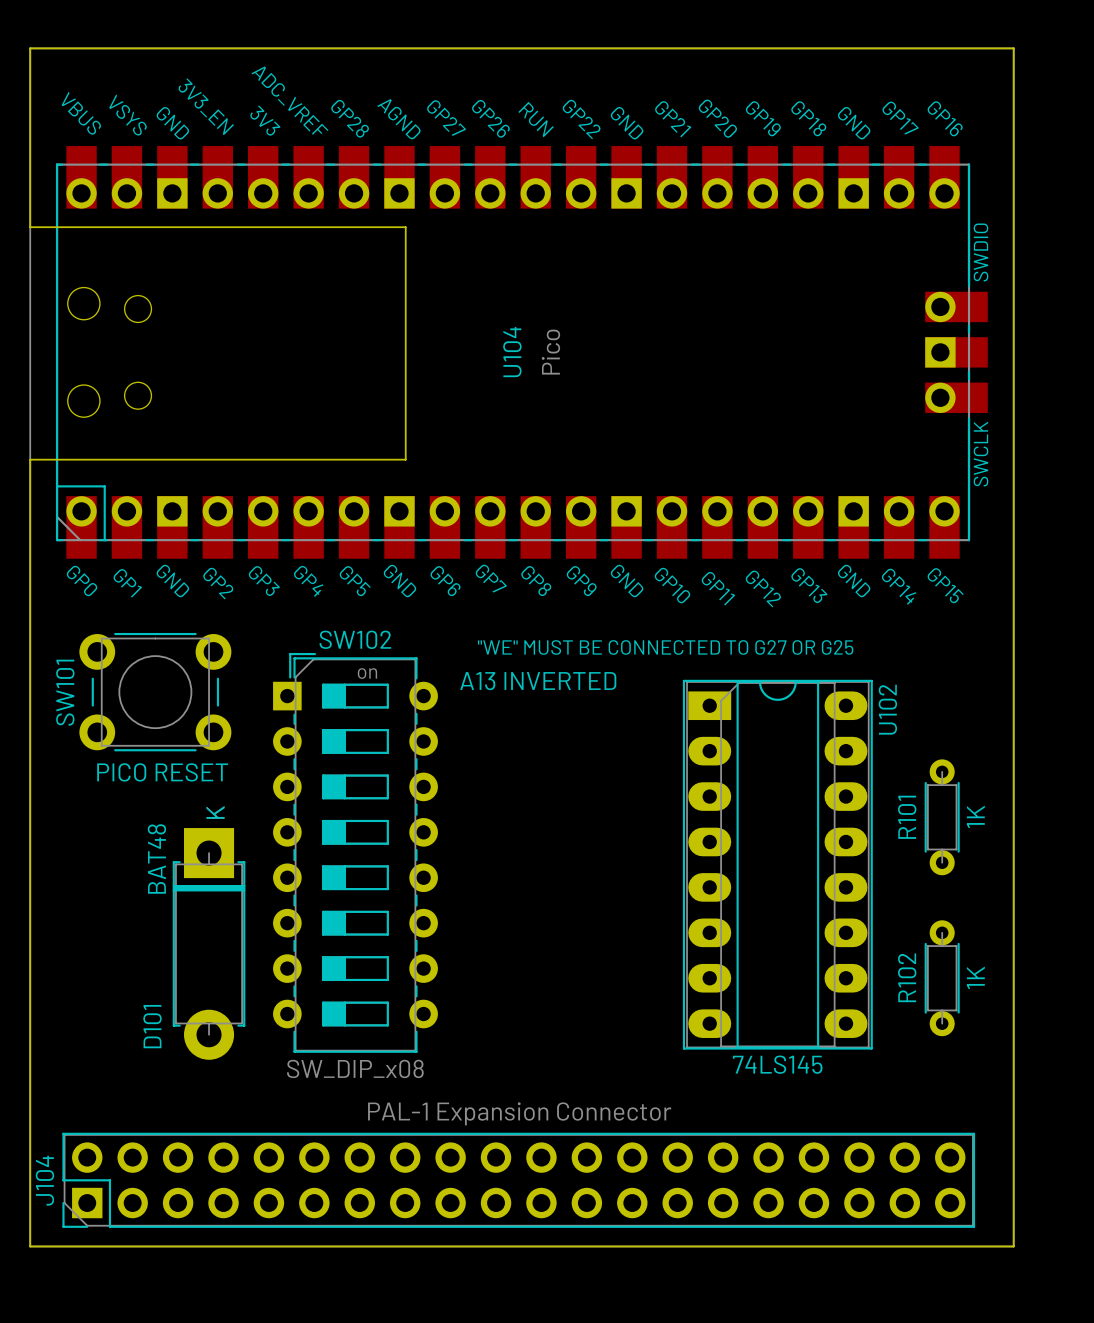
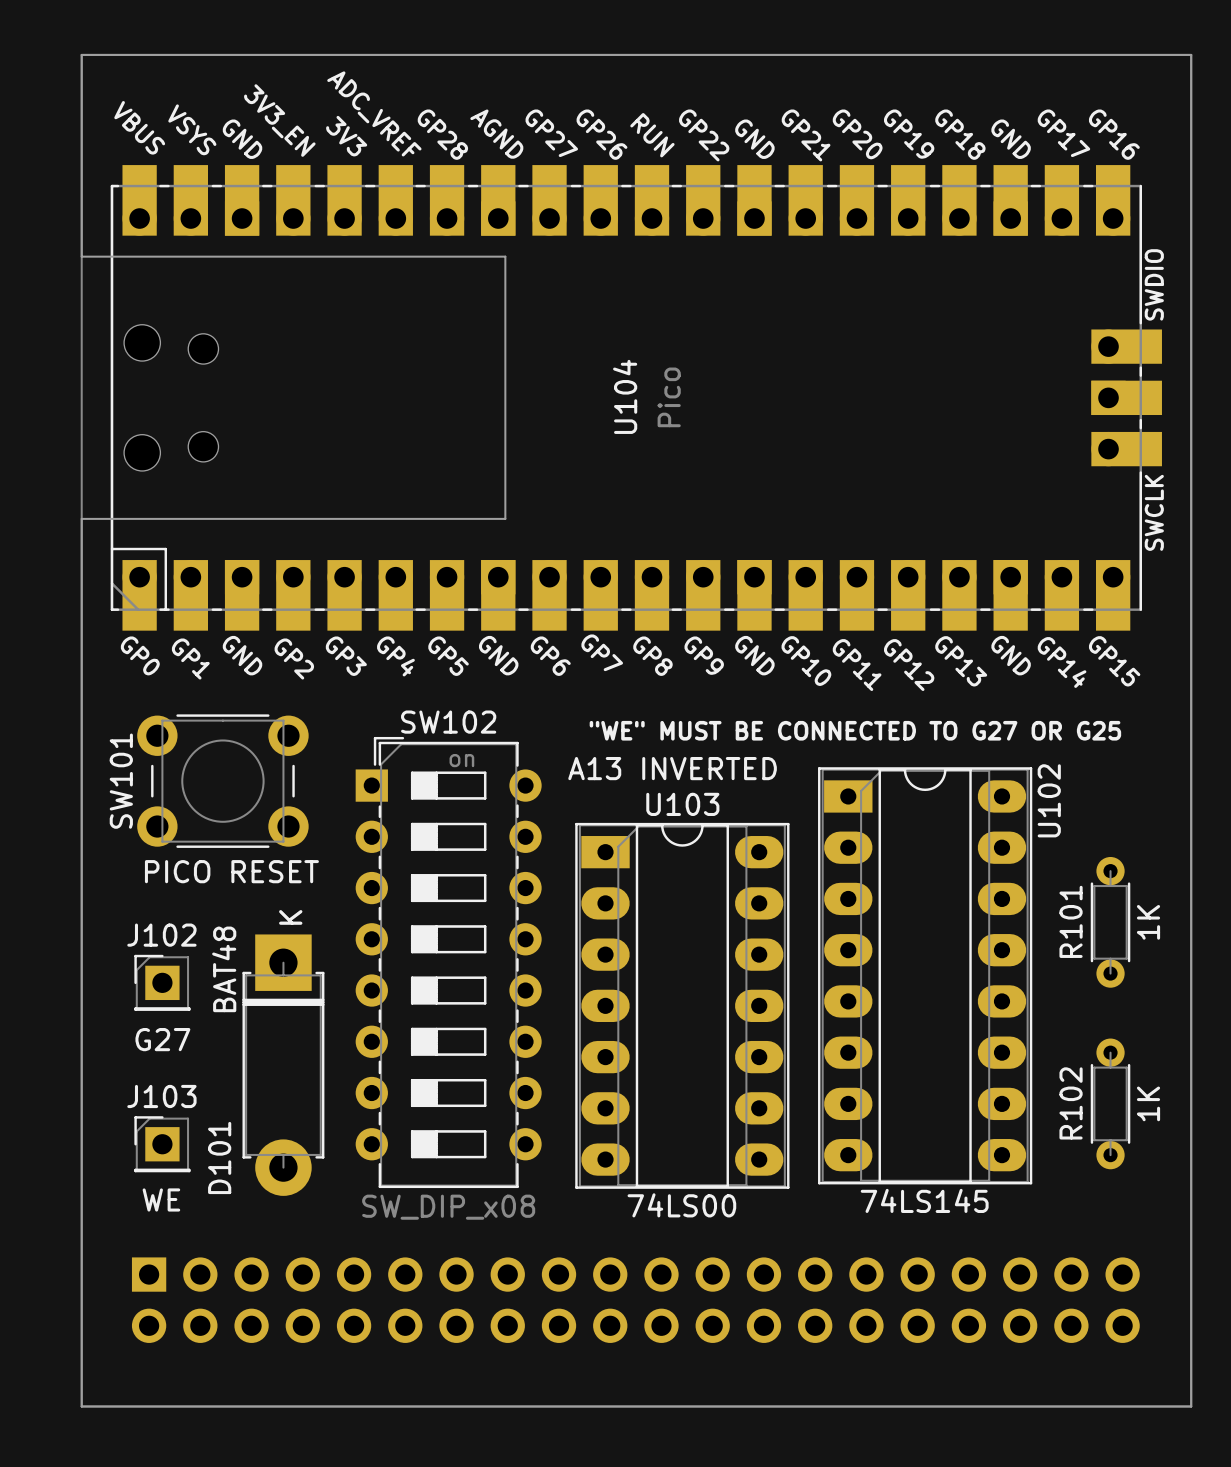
J102: none -> G27 (162, 982)
U103: none -> 74LS00 (682, 1005)
J103: none -> WE (162, 1144)
part: none -> (635, 1300)
J104: PAL-1 Expansion Connector (518, 1180) -> none

